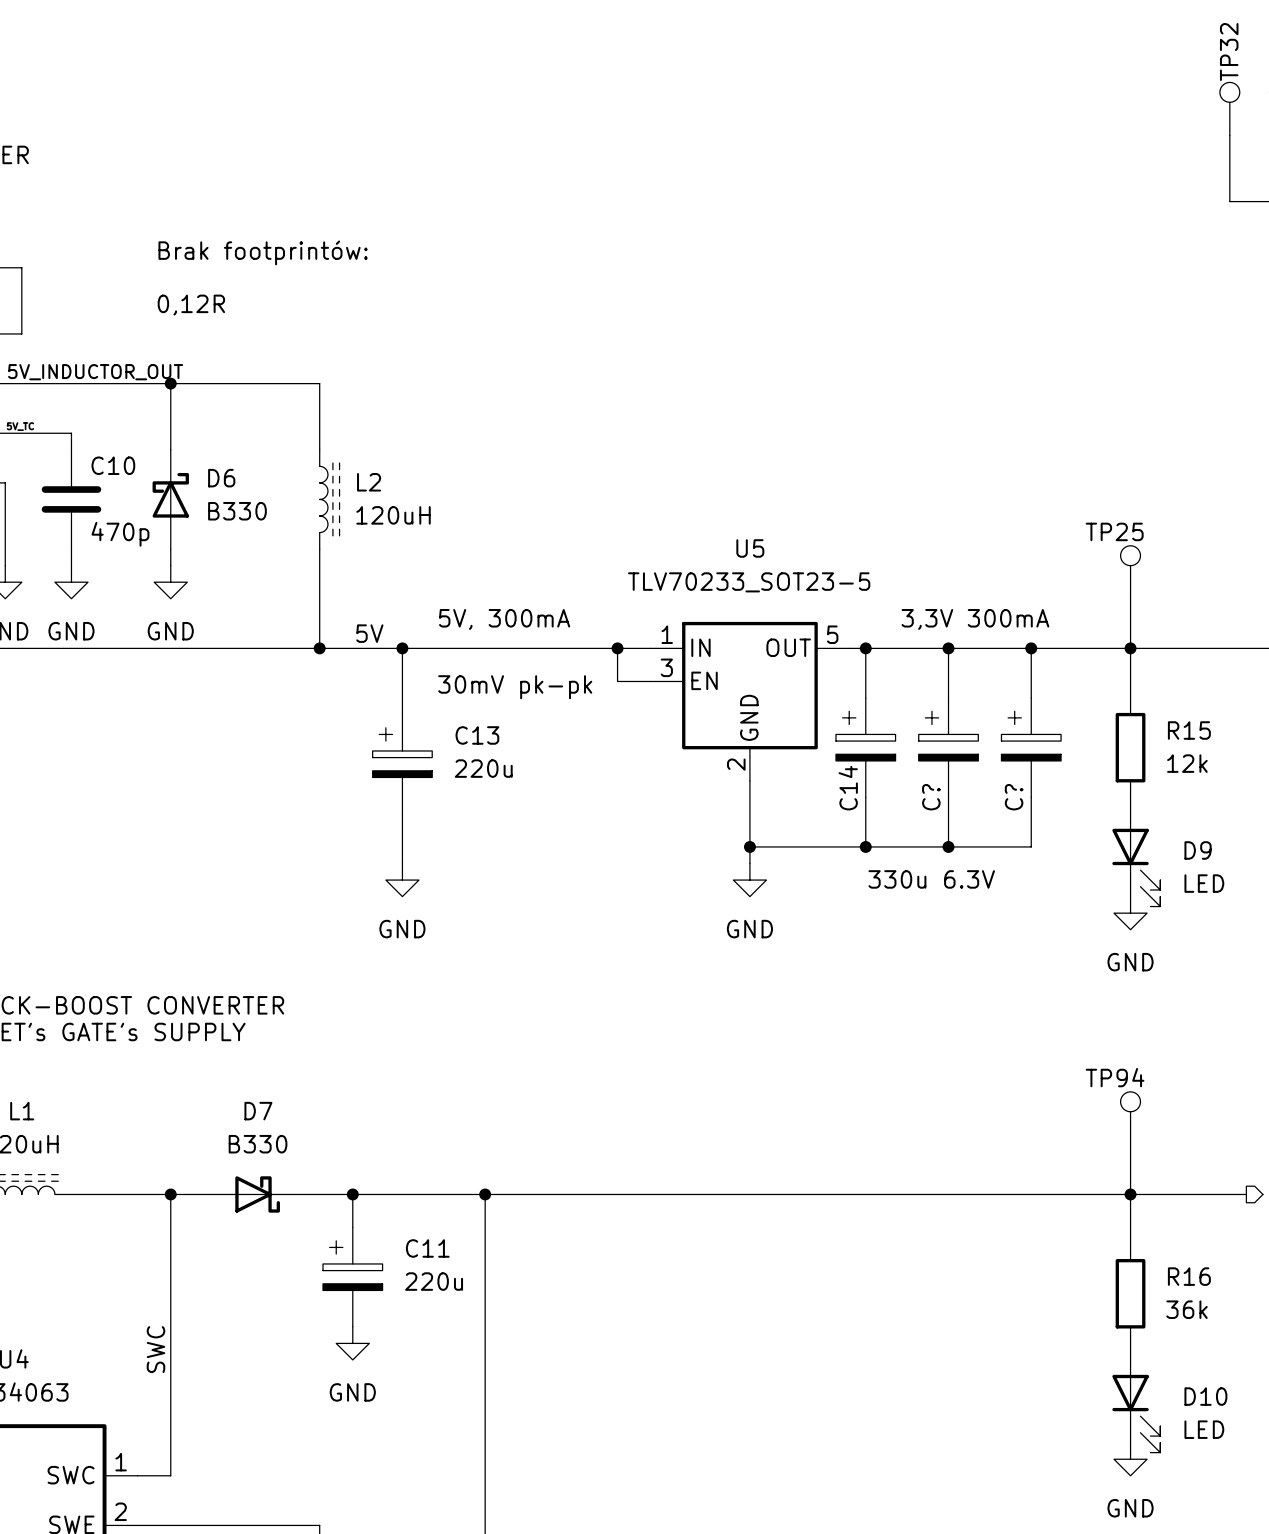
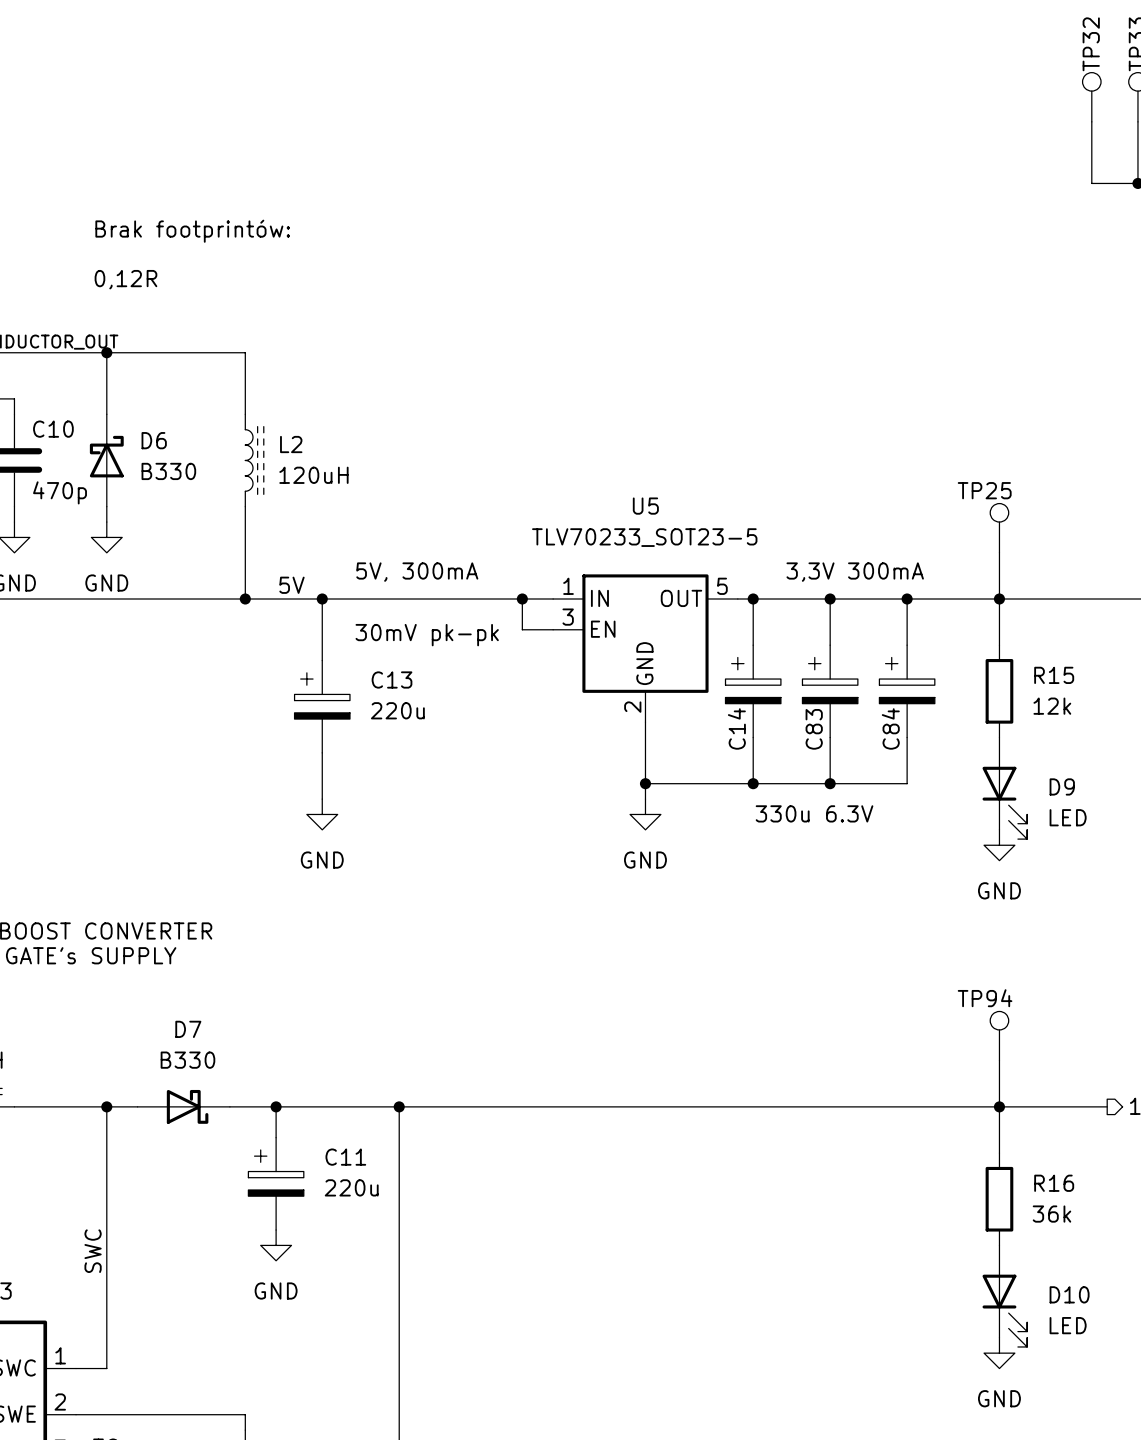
C? name: C? (931, 797) -> C83 (814, 729)
C? name: C? (1014, 797) -> C84 (890, 728)

